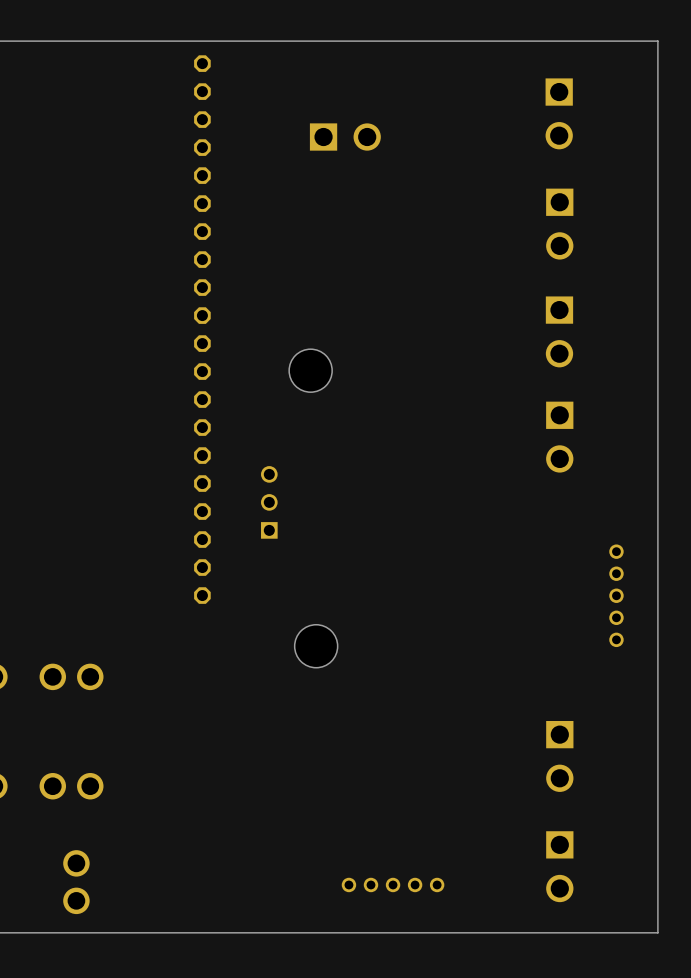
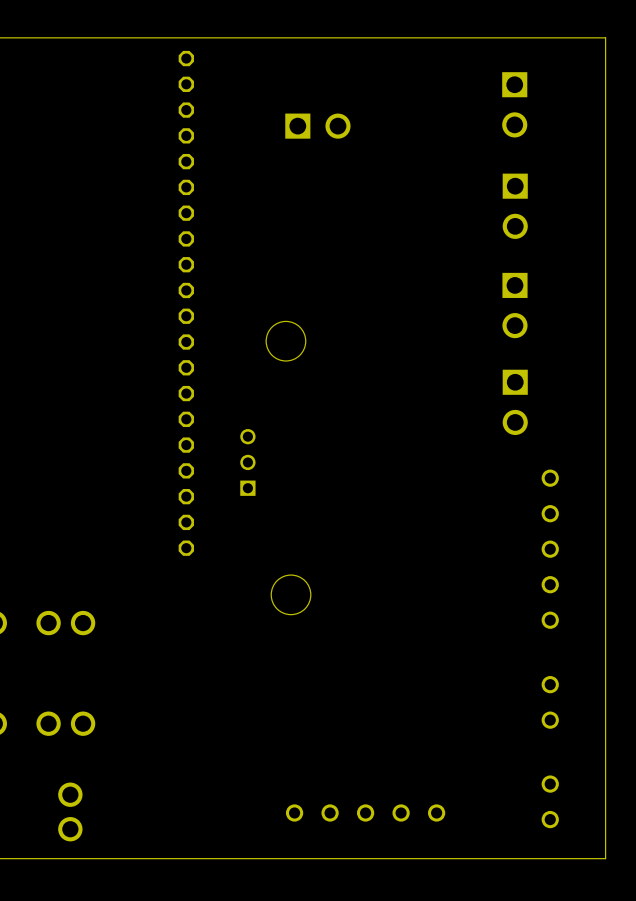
part: (616, 595) -> none
part: none -> (550, 549)
part: (559, 756) -> none
part: none -> (550, 702)
part: (559, 866) -> none
part: none -> (550, 801)
part footprint: [341, 877, 445, 893] -> [285, 804, 446, 822]

